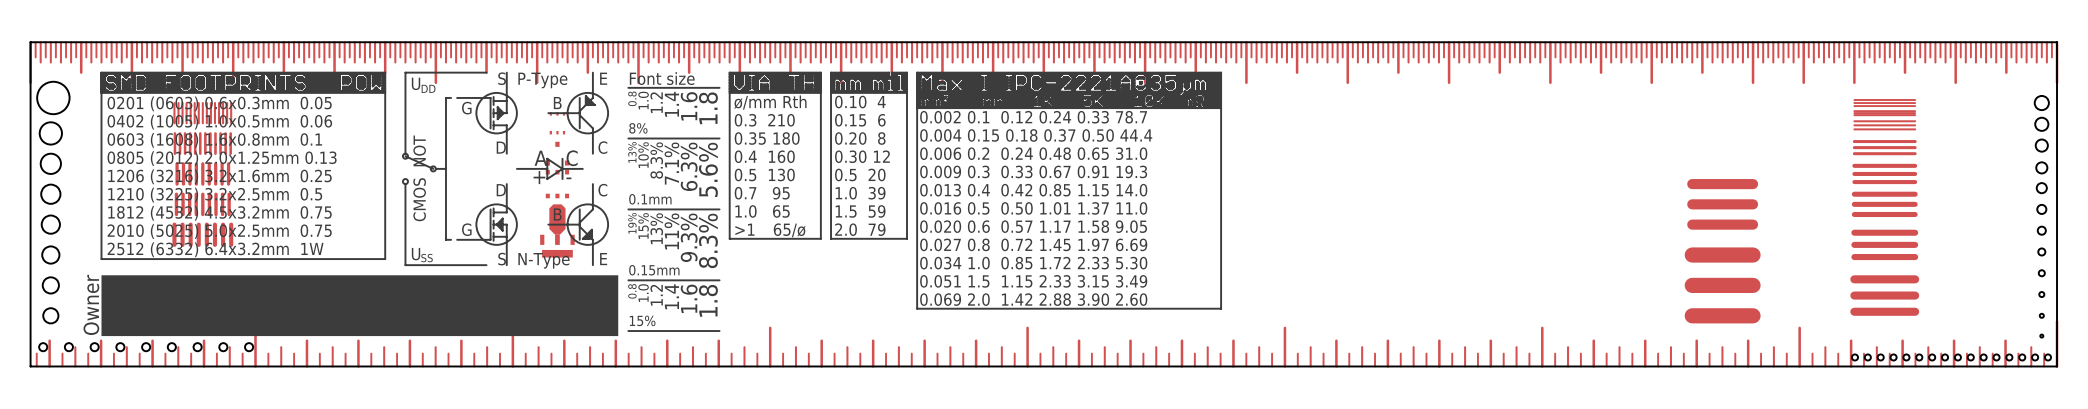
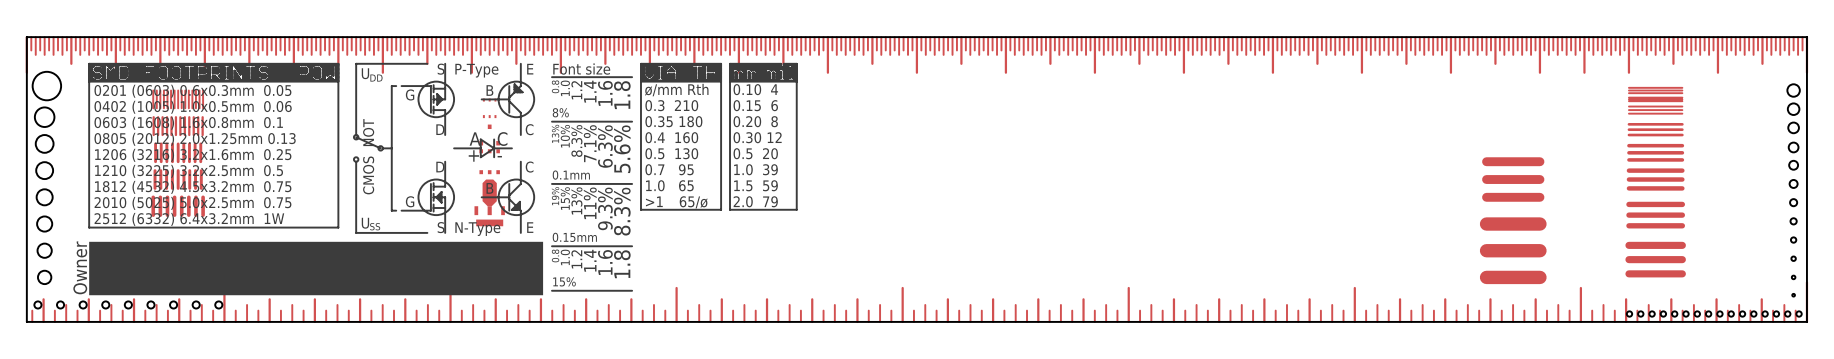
drawing: [916, 71, 1222, 310] -> none

